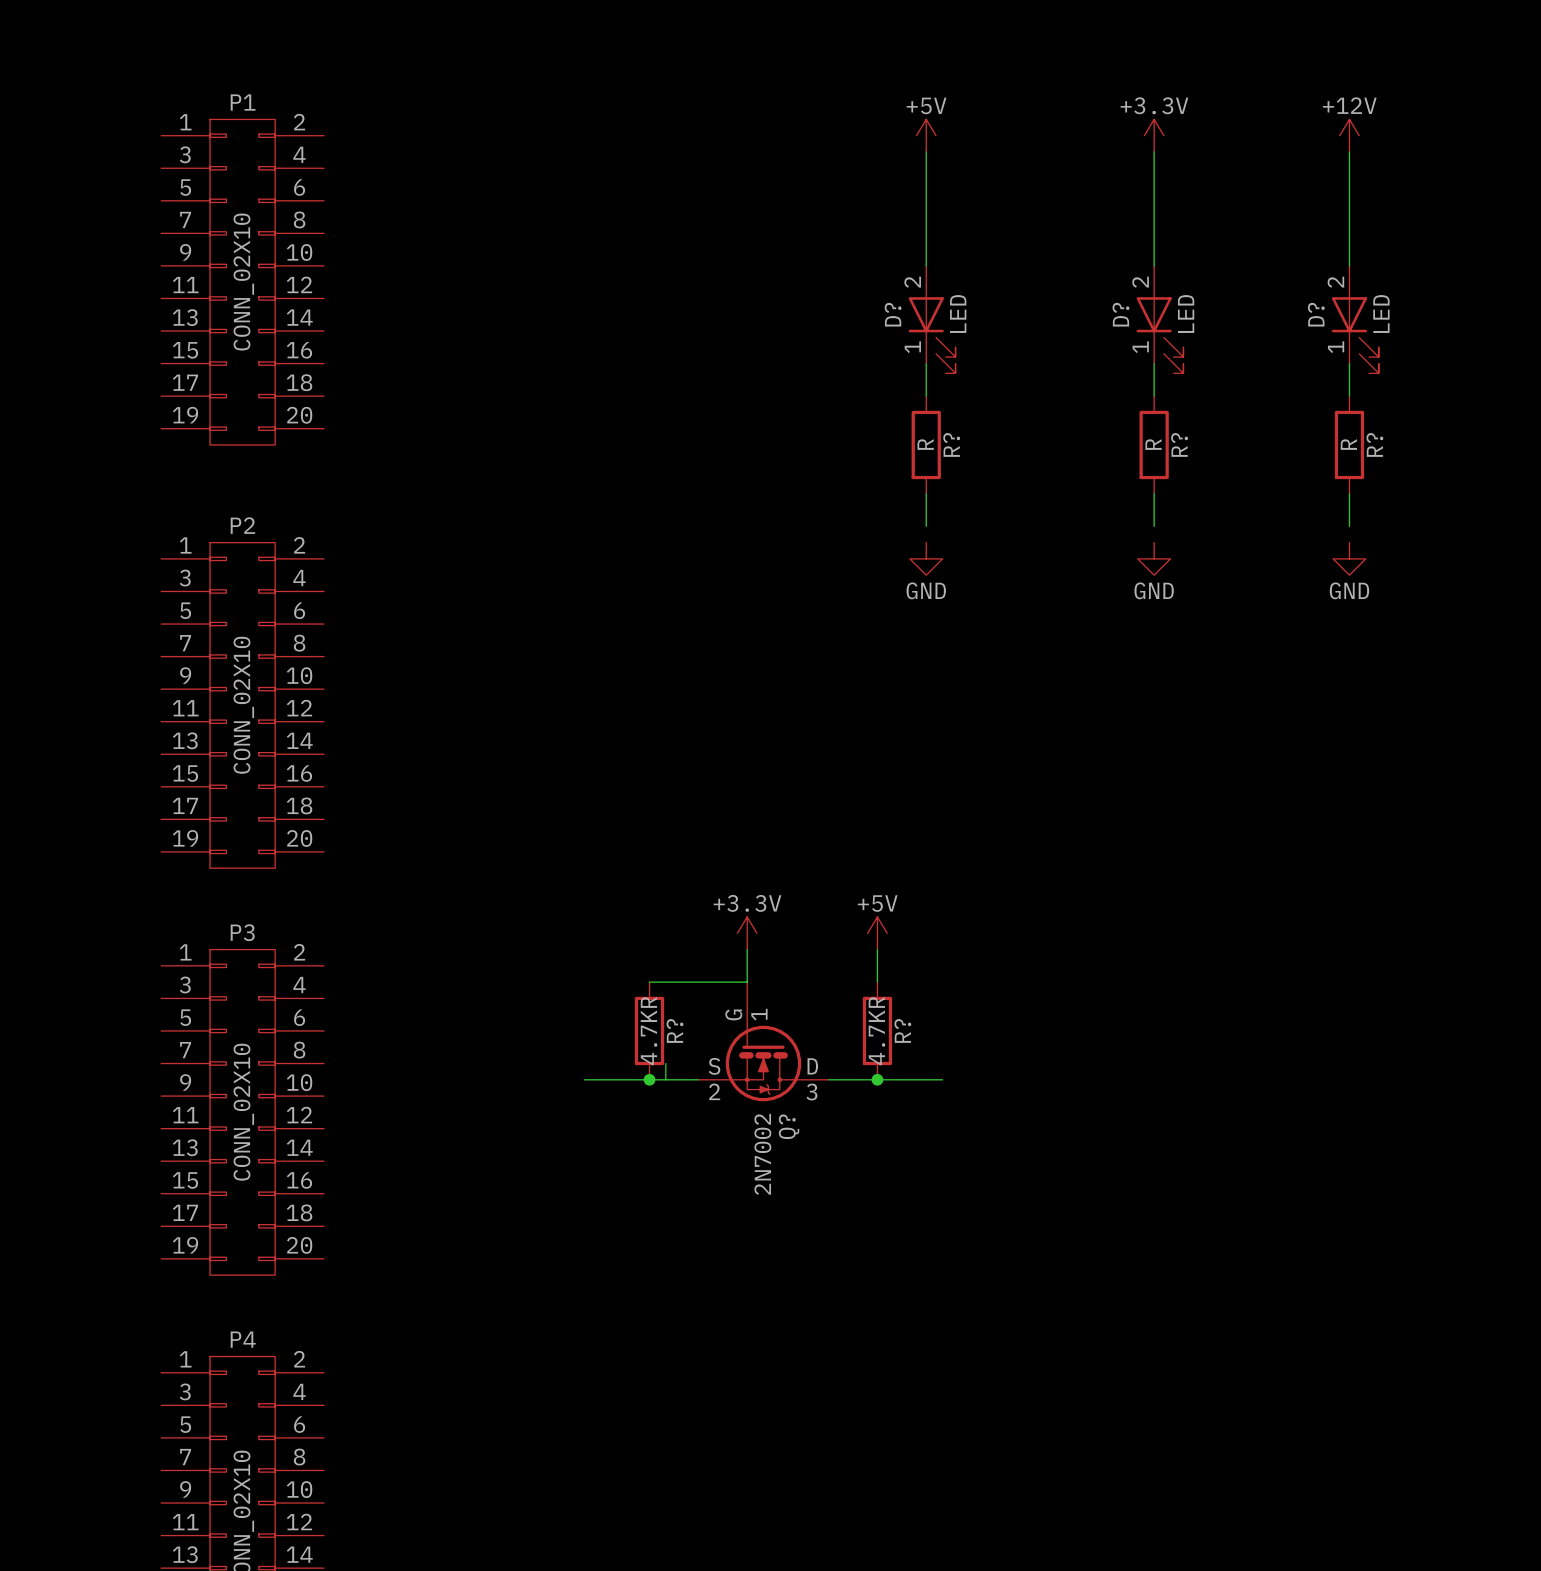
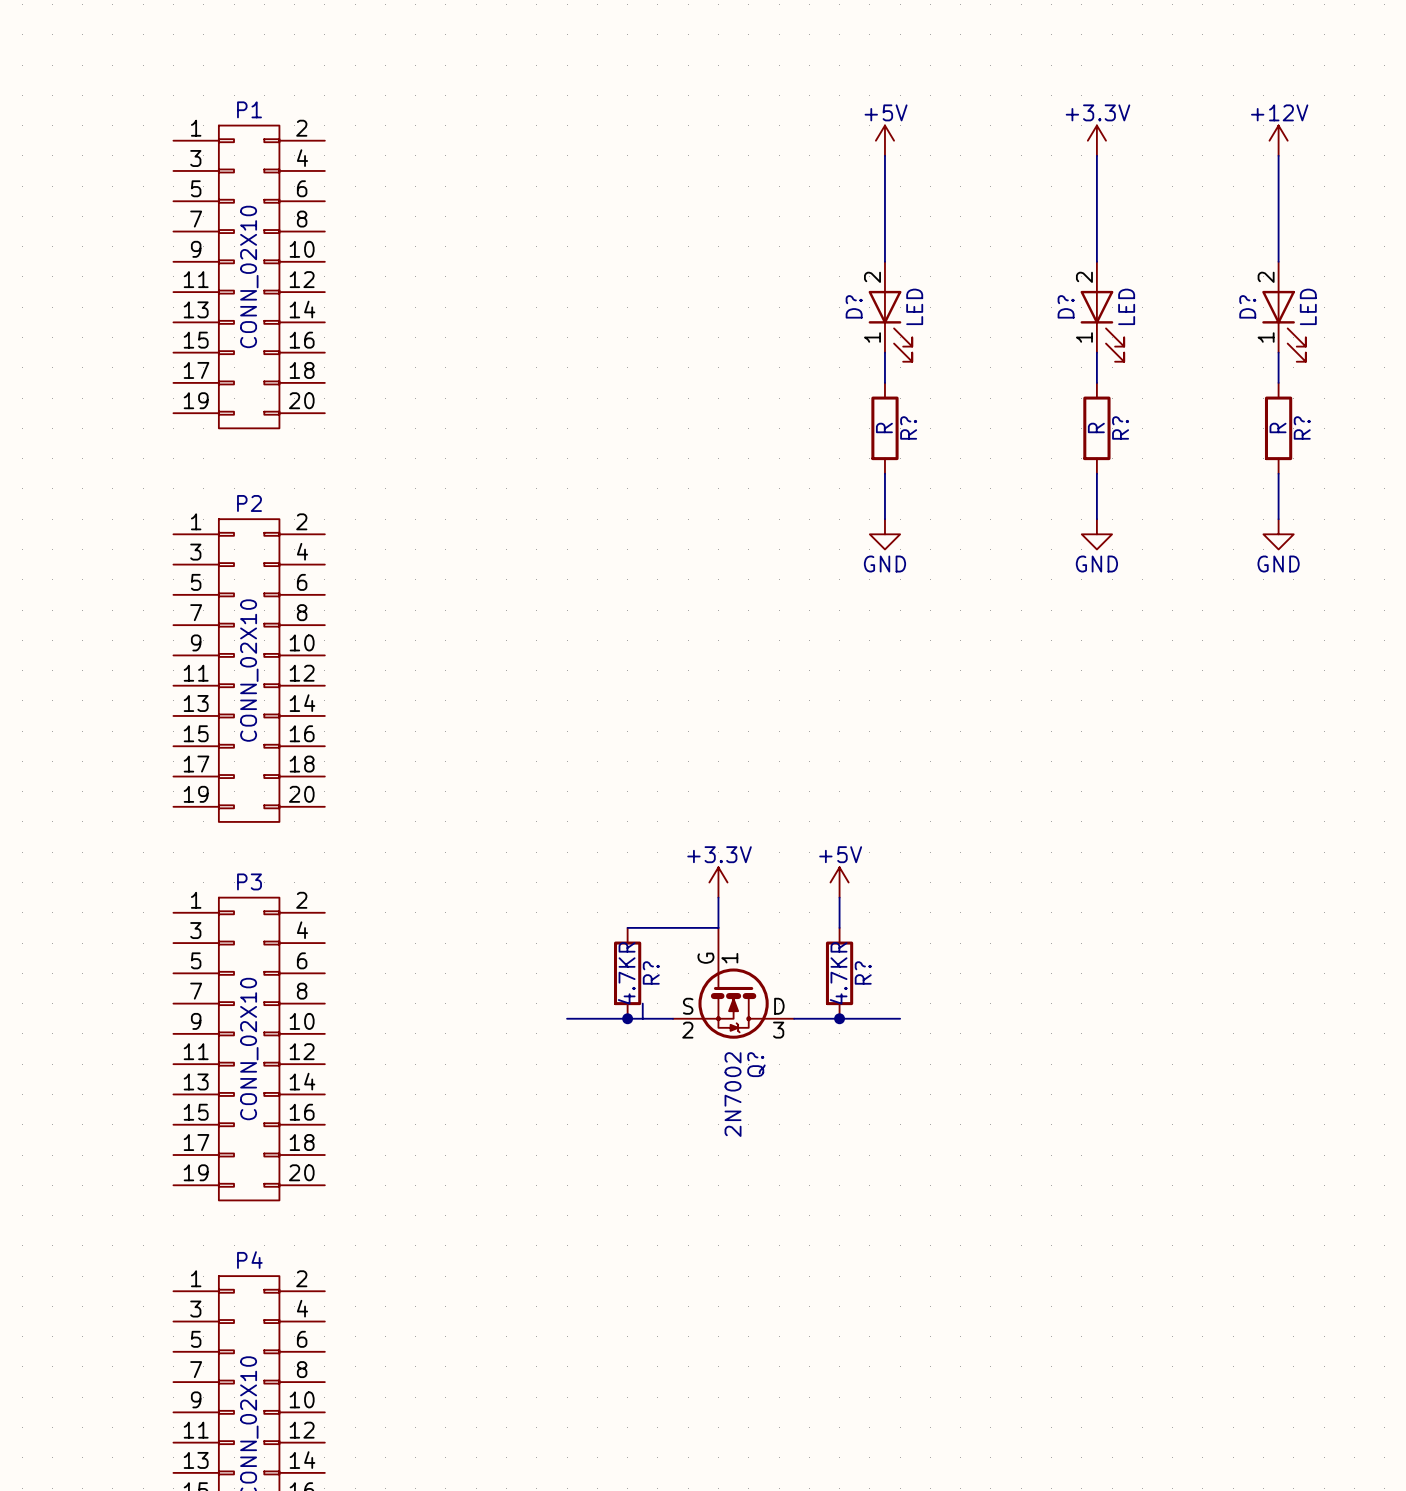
wire: none -> (884, 504) (884, 519)
wire: none -> (1096, 504) (1096, 519)
wire: none -> (1278, 504) (1278, 519)

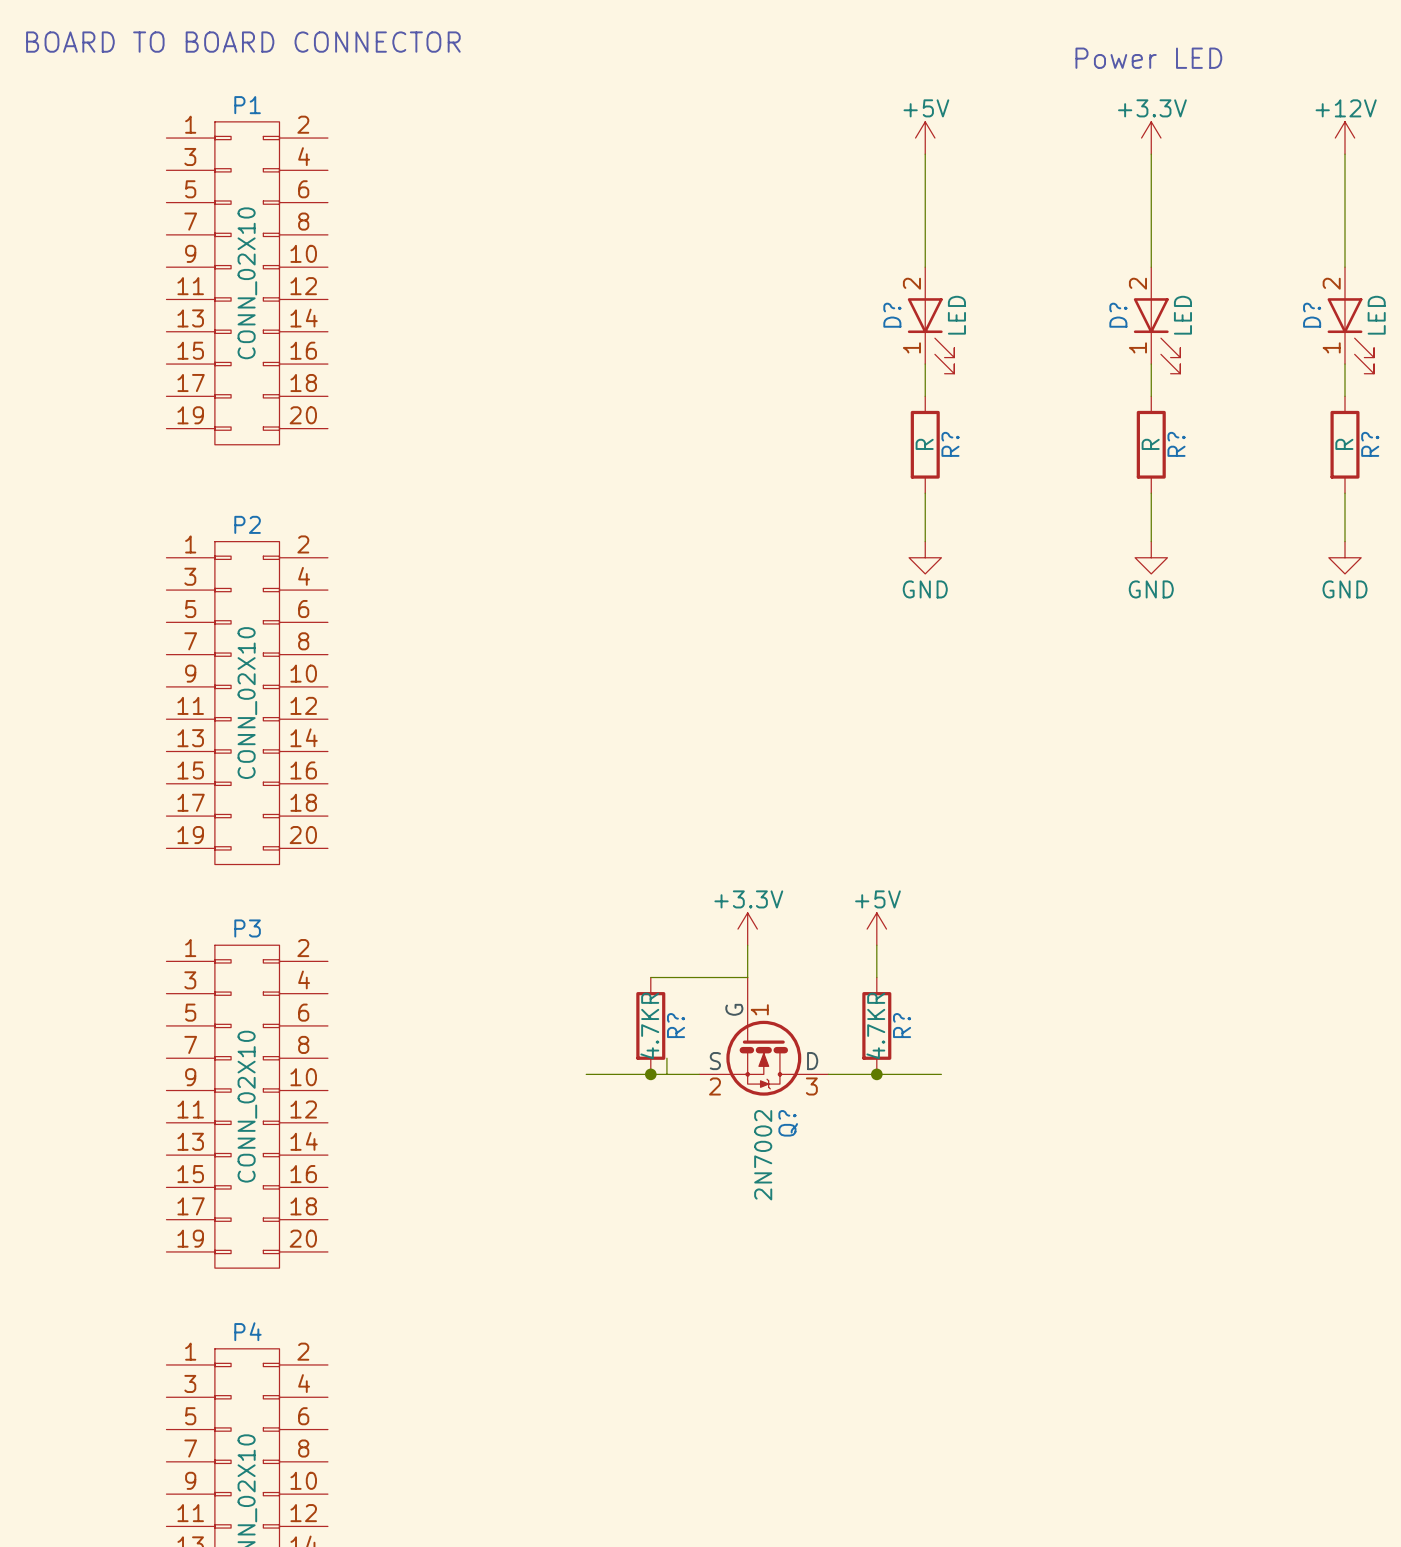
text: none -> BOARD TO BOARD CONNECTOR (243, 42)
text: none -> Power LED (1148, 58)

